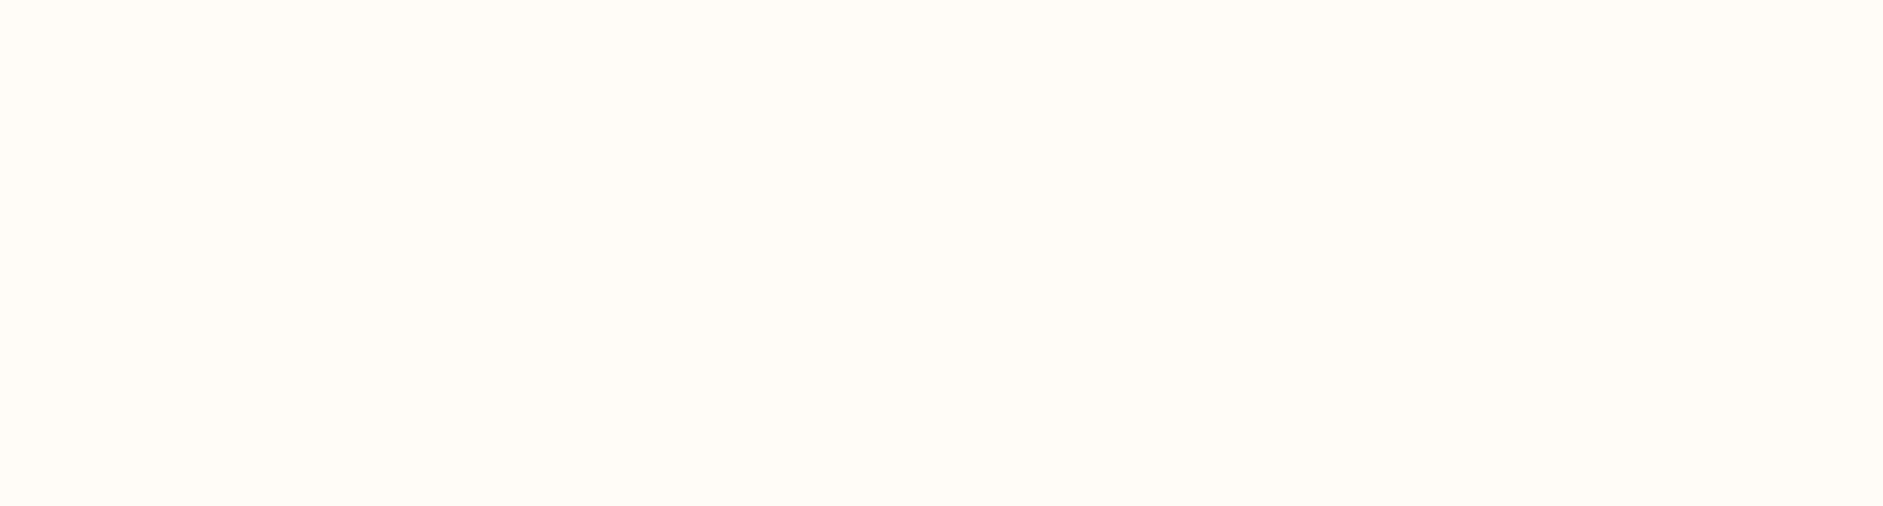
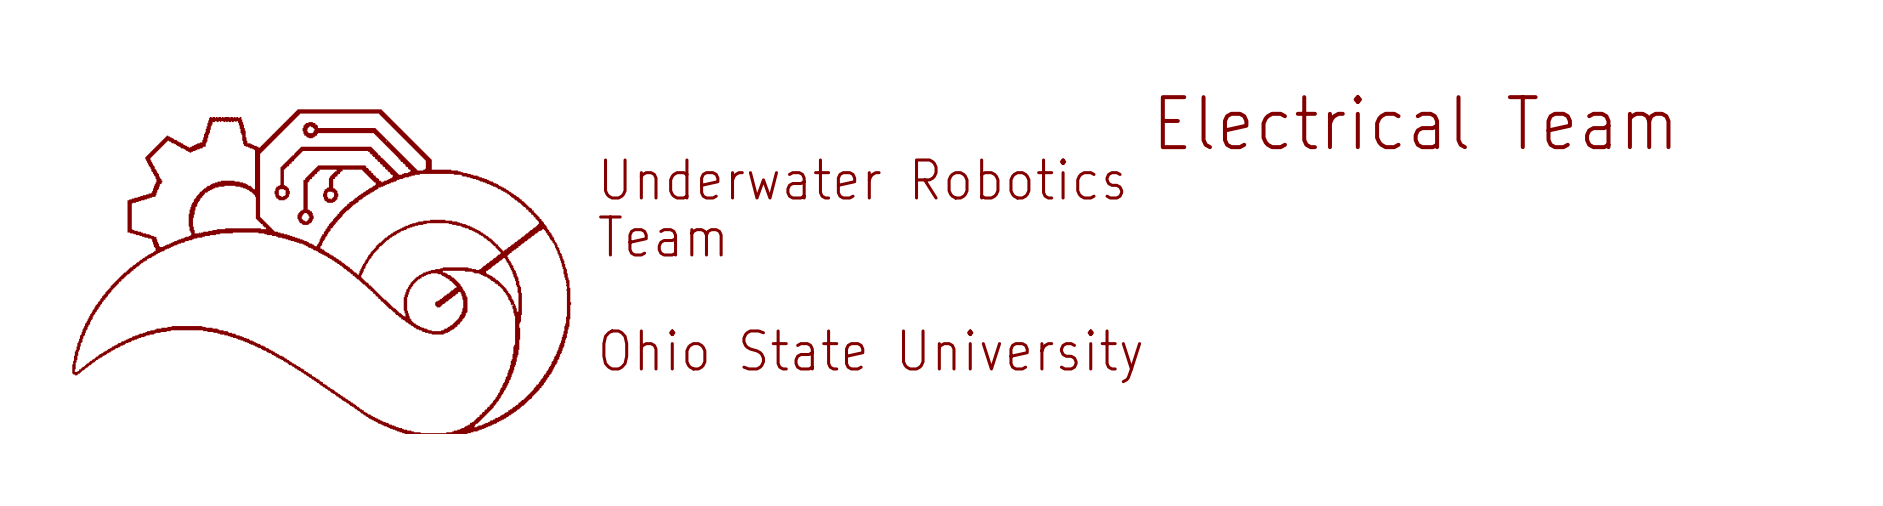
drawing: none -> [72, 109, 572, 434]
text: none -> Electrical Team (1415, 122)
text: none -> Underwater Robotics (863, 178)
text: none -> Team (660, 235)
text: none -> Ohio State University (871, 356)

